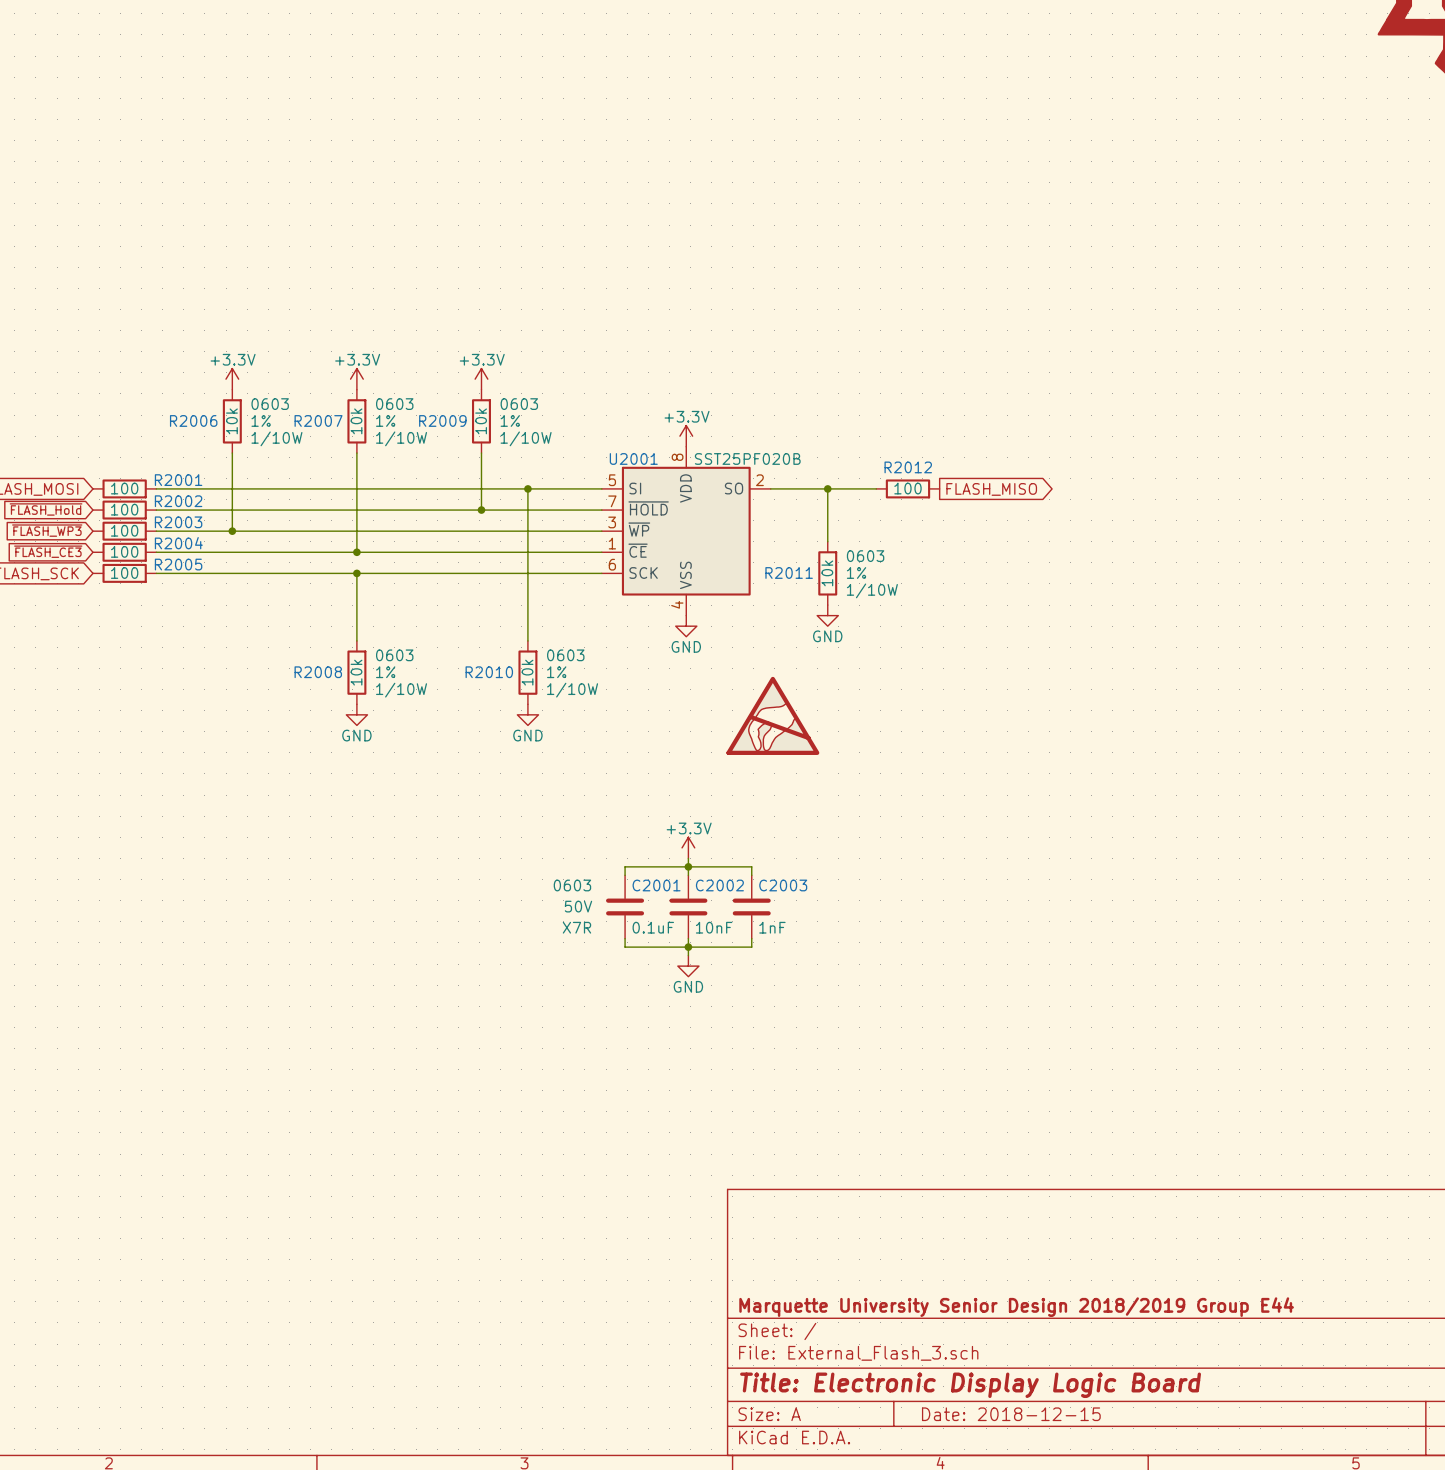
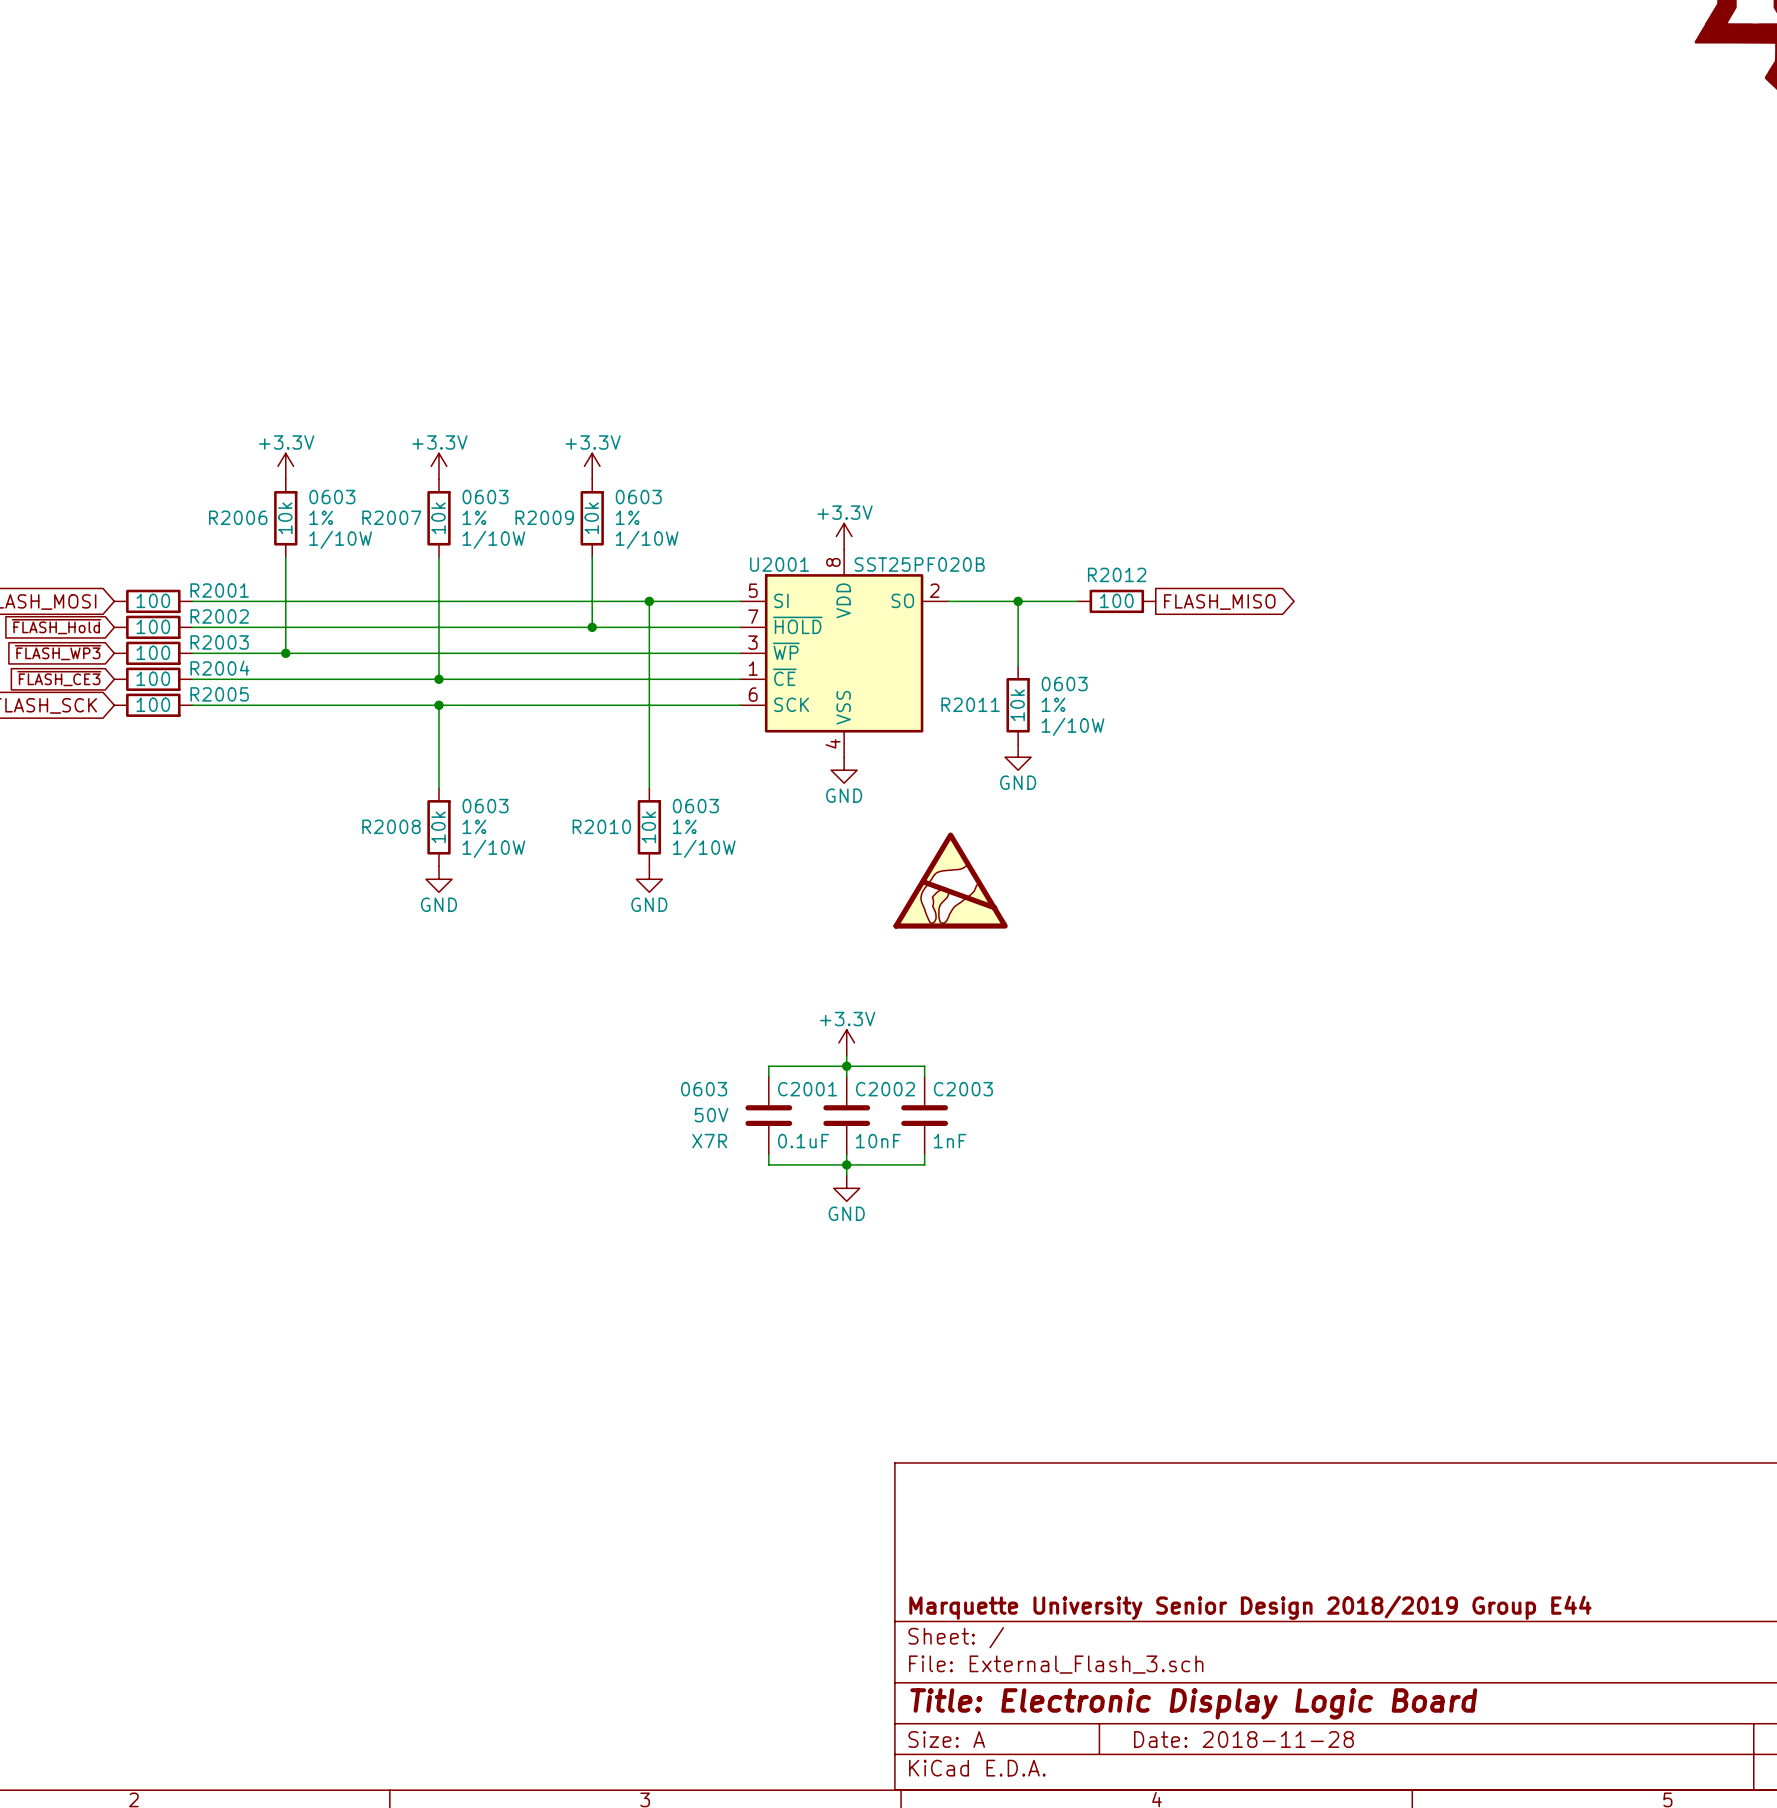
title block: Date: 2018-12-15 (1011, 1414) -> Date: 2018-11-28 (1243, 1739)

